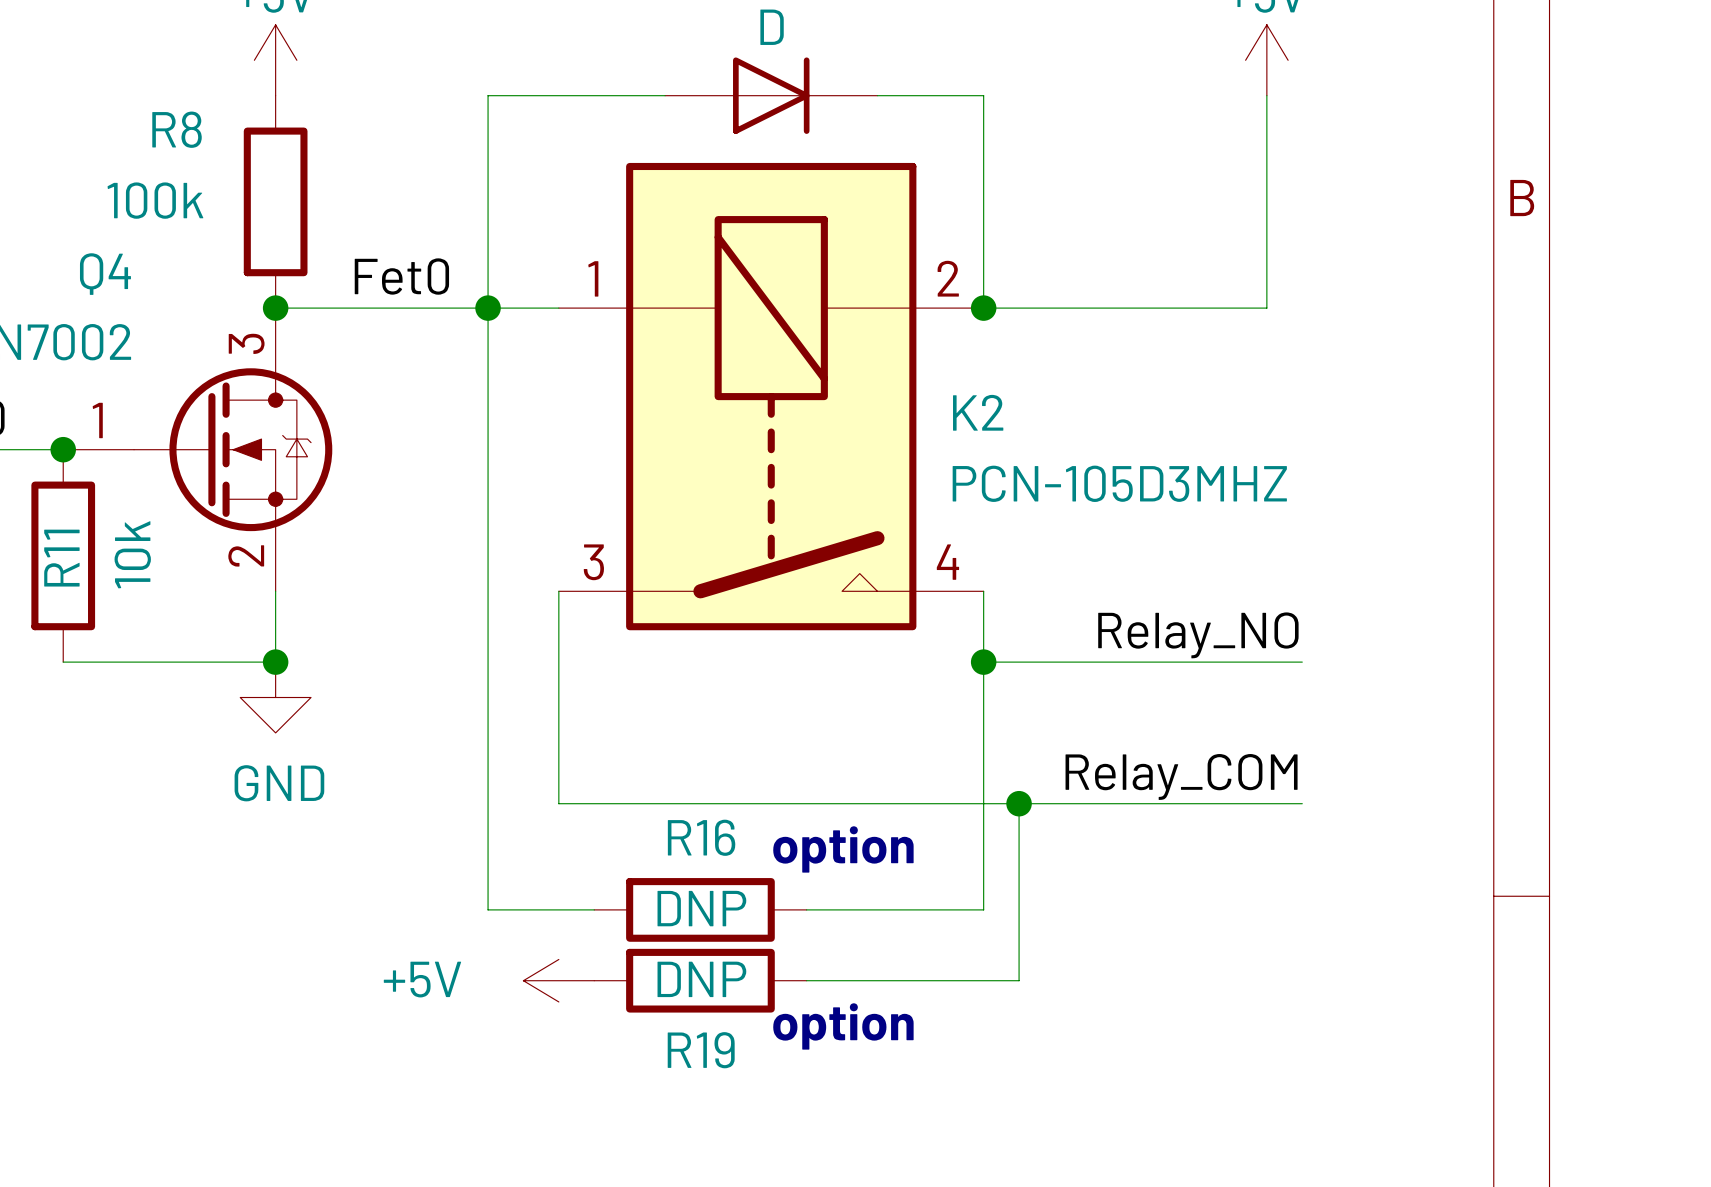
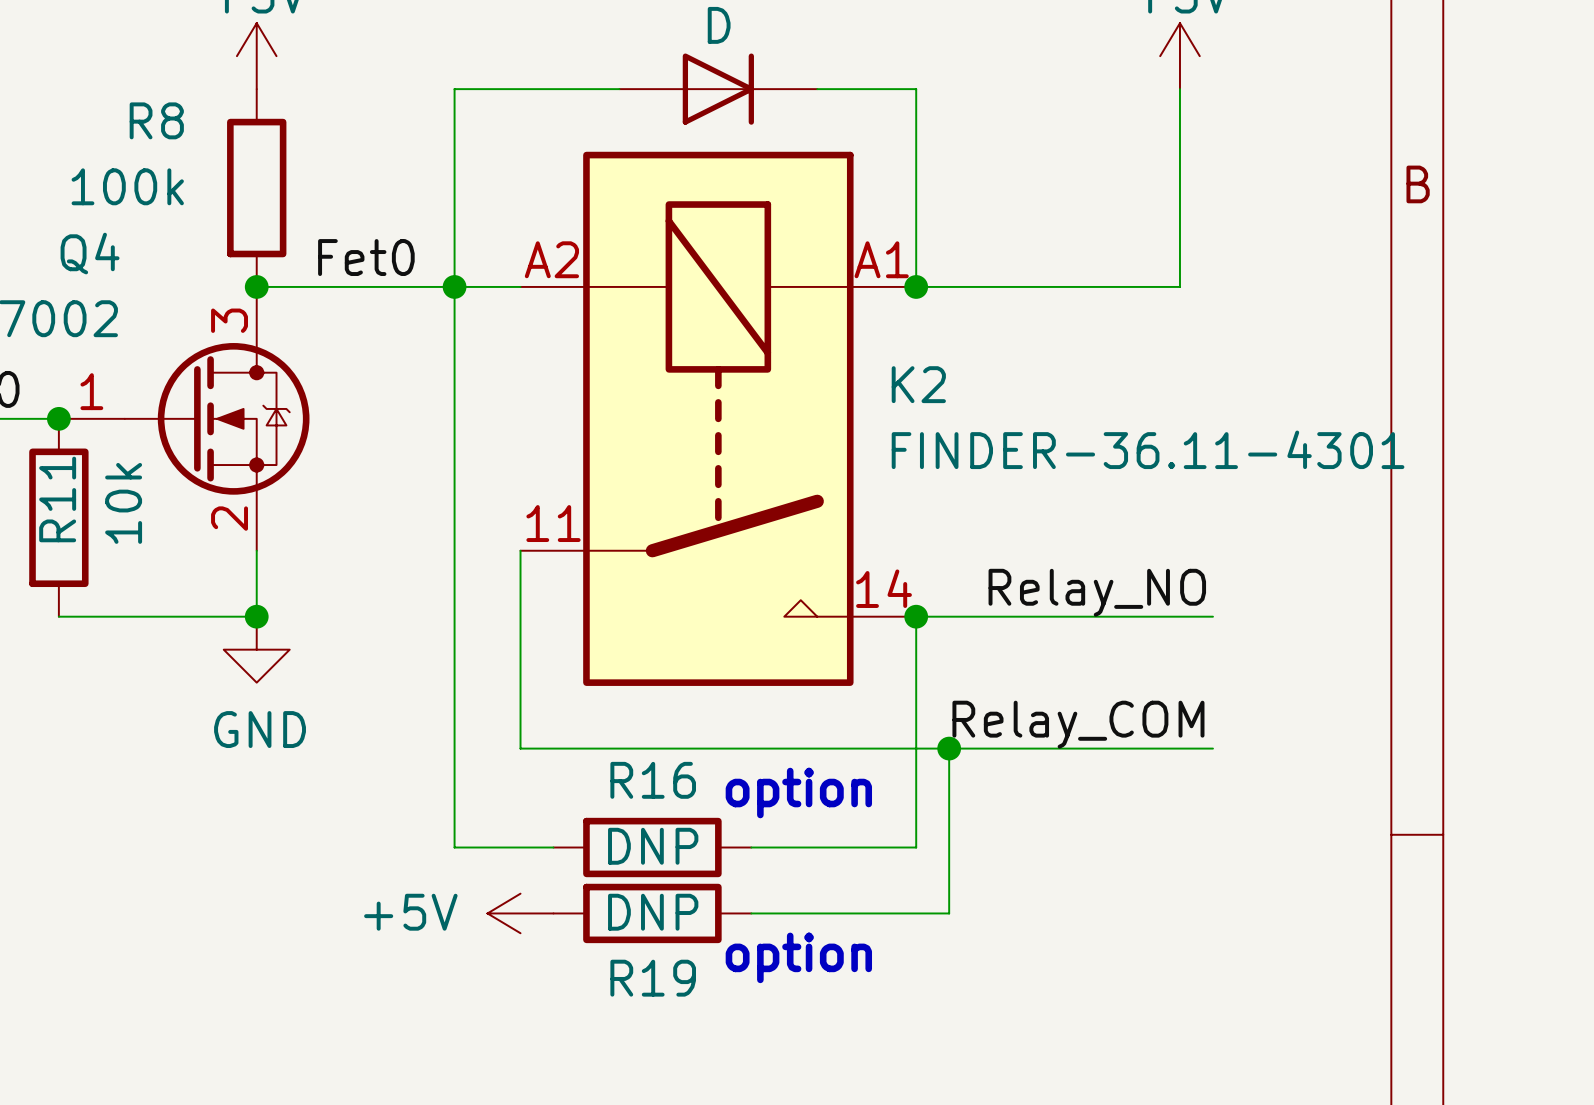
K2 symbol: [558, 162, 984, 631] -> [520, 151, 917, 686]
K2 value: PCN-105D3MHZ (1119, 483) -> FINDER-36.11-4301 (1148, 449)
wire: (983, 591) (983, 662) -> none

